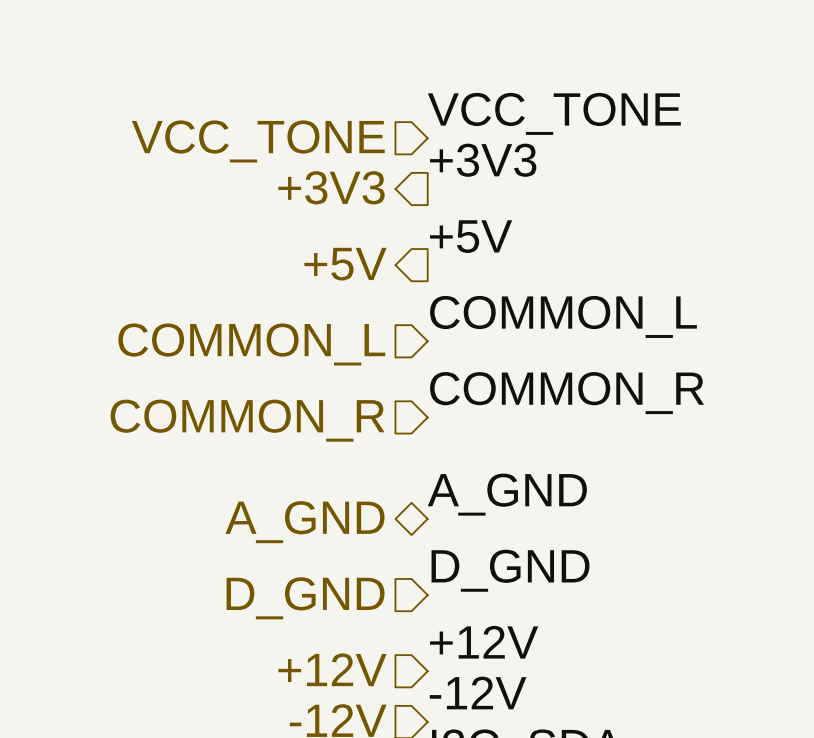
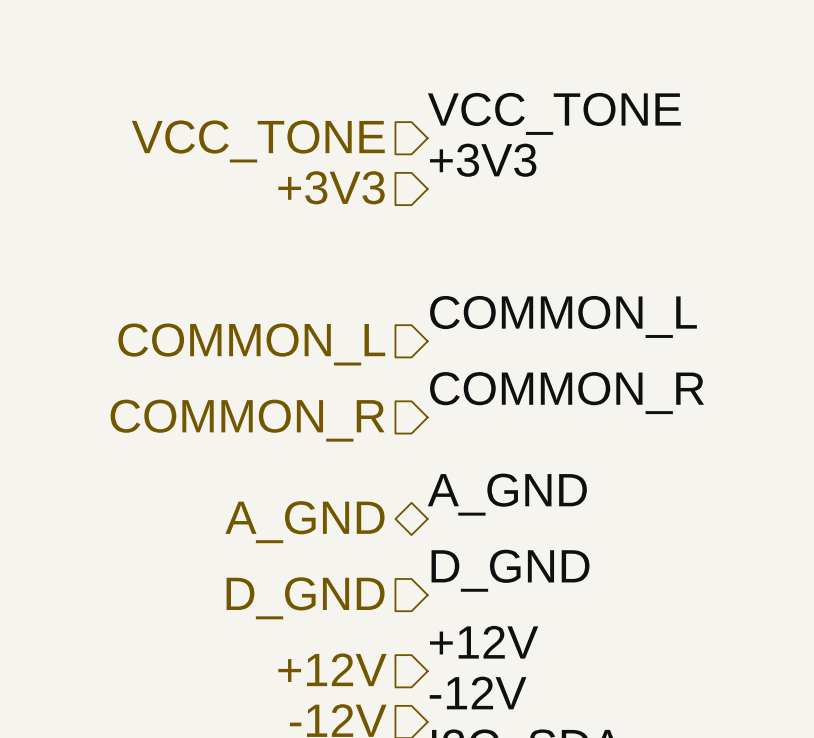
hierarchical label shape: output (331, 187) -> input (331, 187)
label: +5V (471, 236) -> none
hierarchical label: +5V (345, 264) -> none

